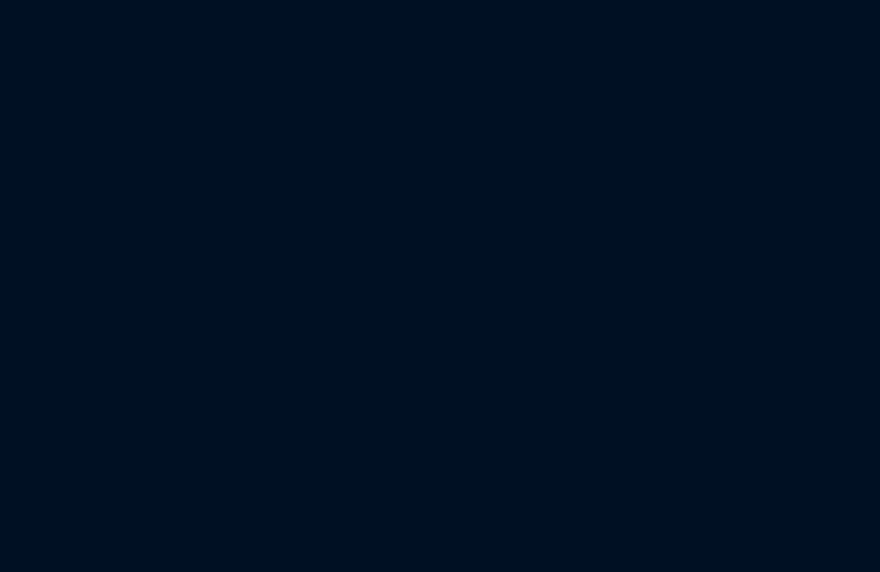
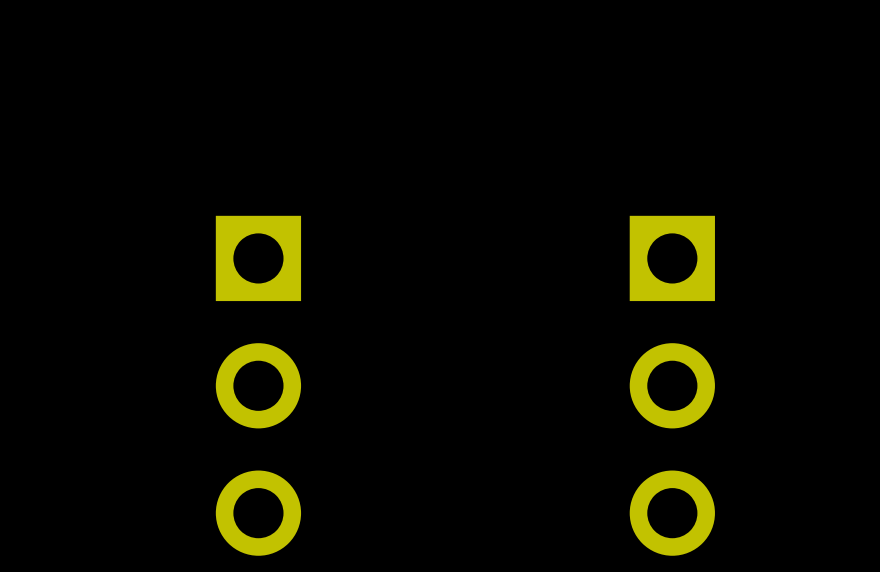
part: none -> (258, 385)
part: none -> (672, 385)

